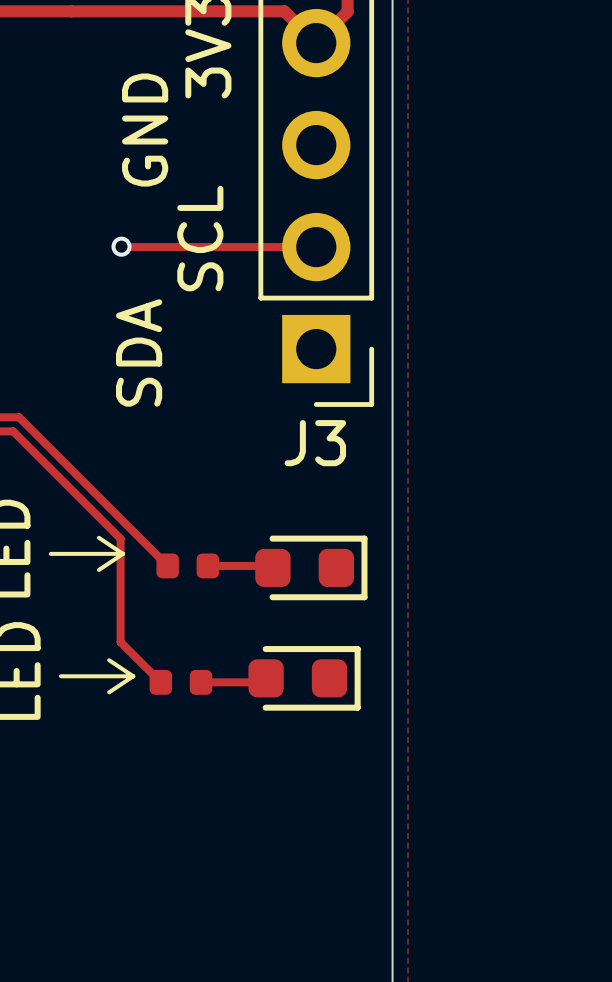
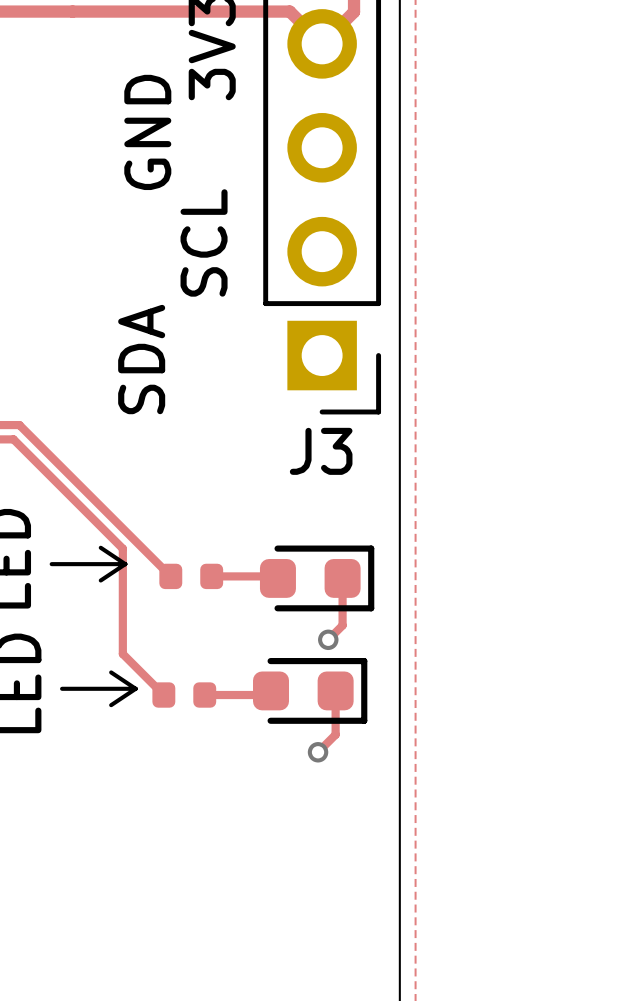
via: (121, 246) -> none
track: (121, 247) (316, 247) -> none
track: none -> (342, 578) (342, 625) (328, 639)
via: none -> (328, 639)
track: none -> (335, 690) (335, 734) (318, 752)
via: none -> (318, 752)

